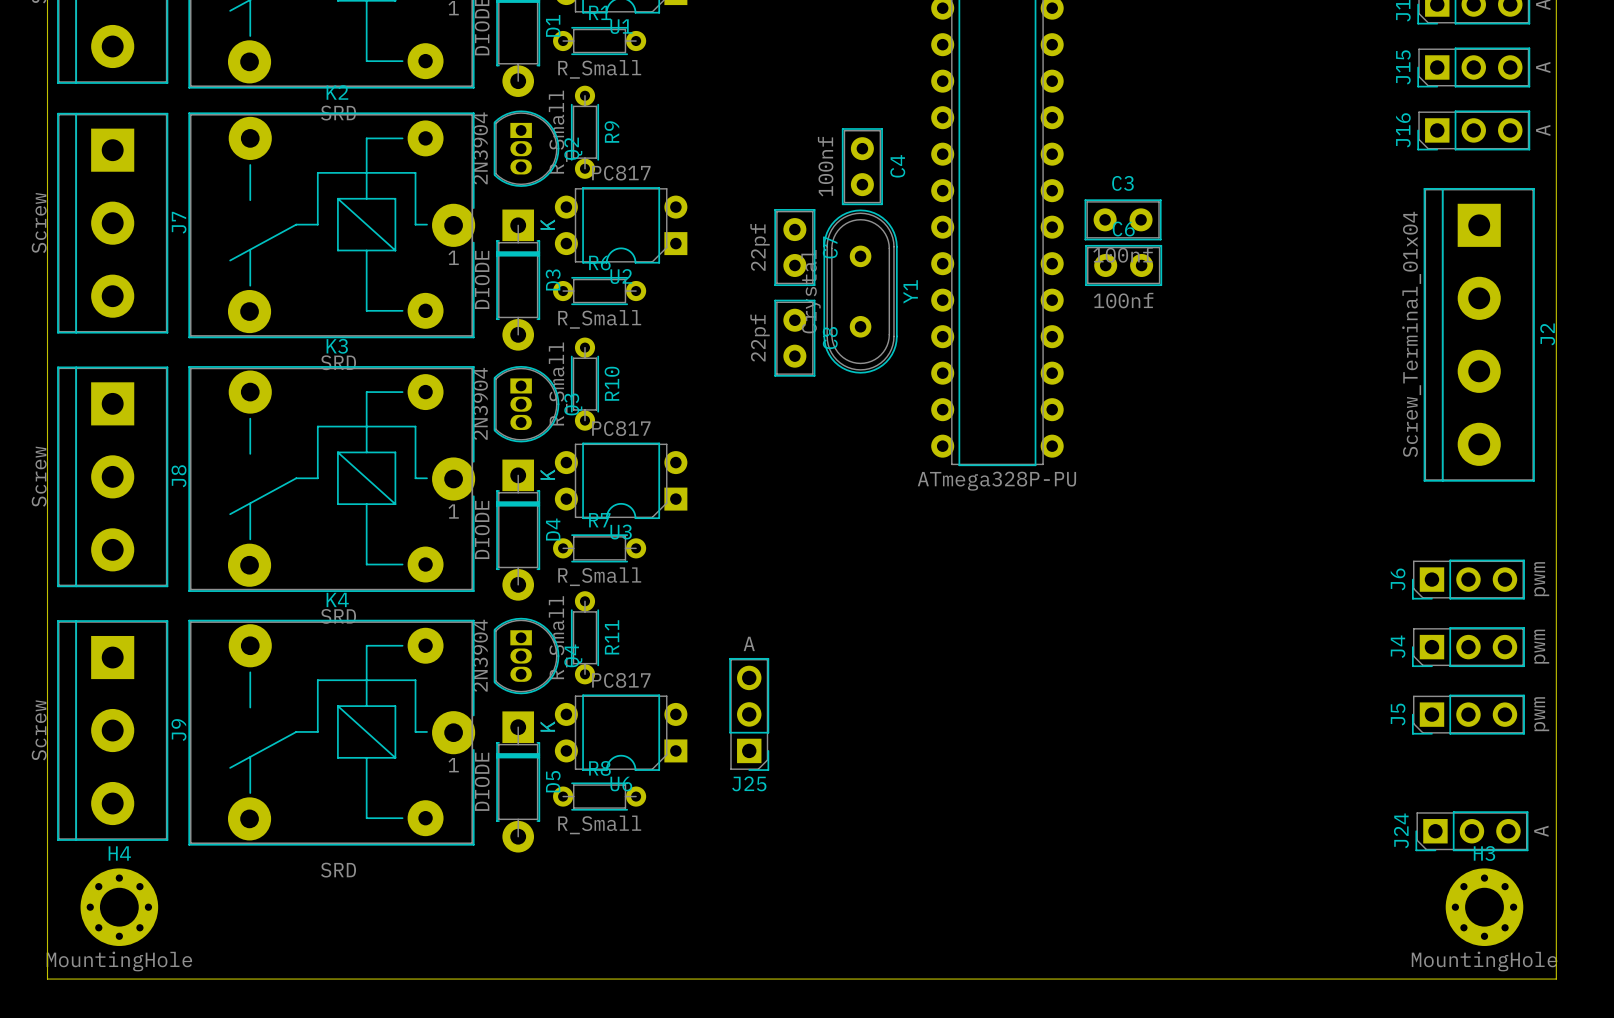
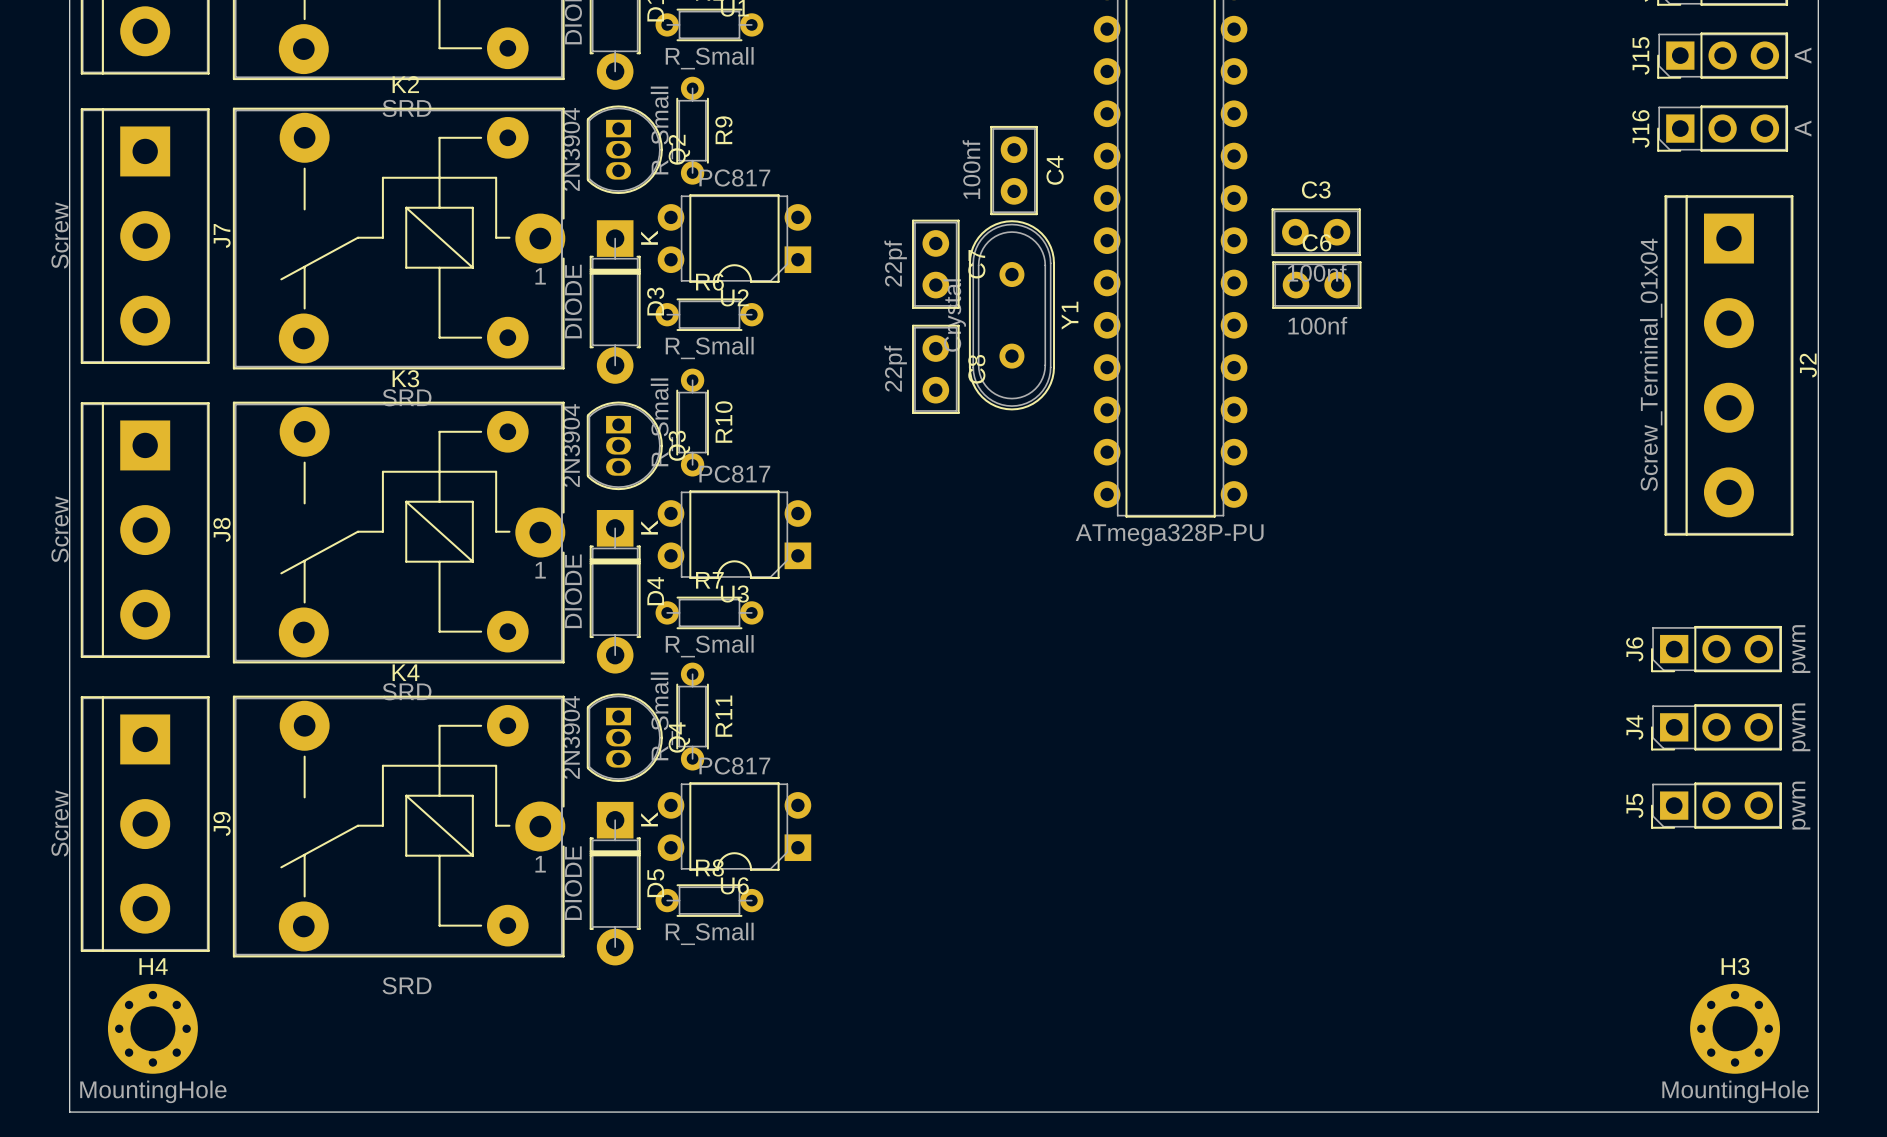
J25: A (749, 714) -> none
J24: A (1471, 831) -> none

